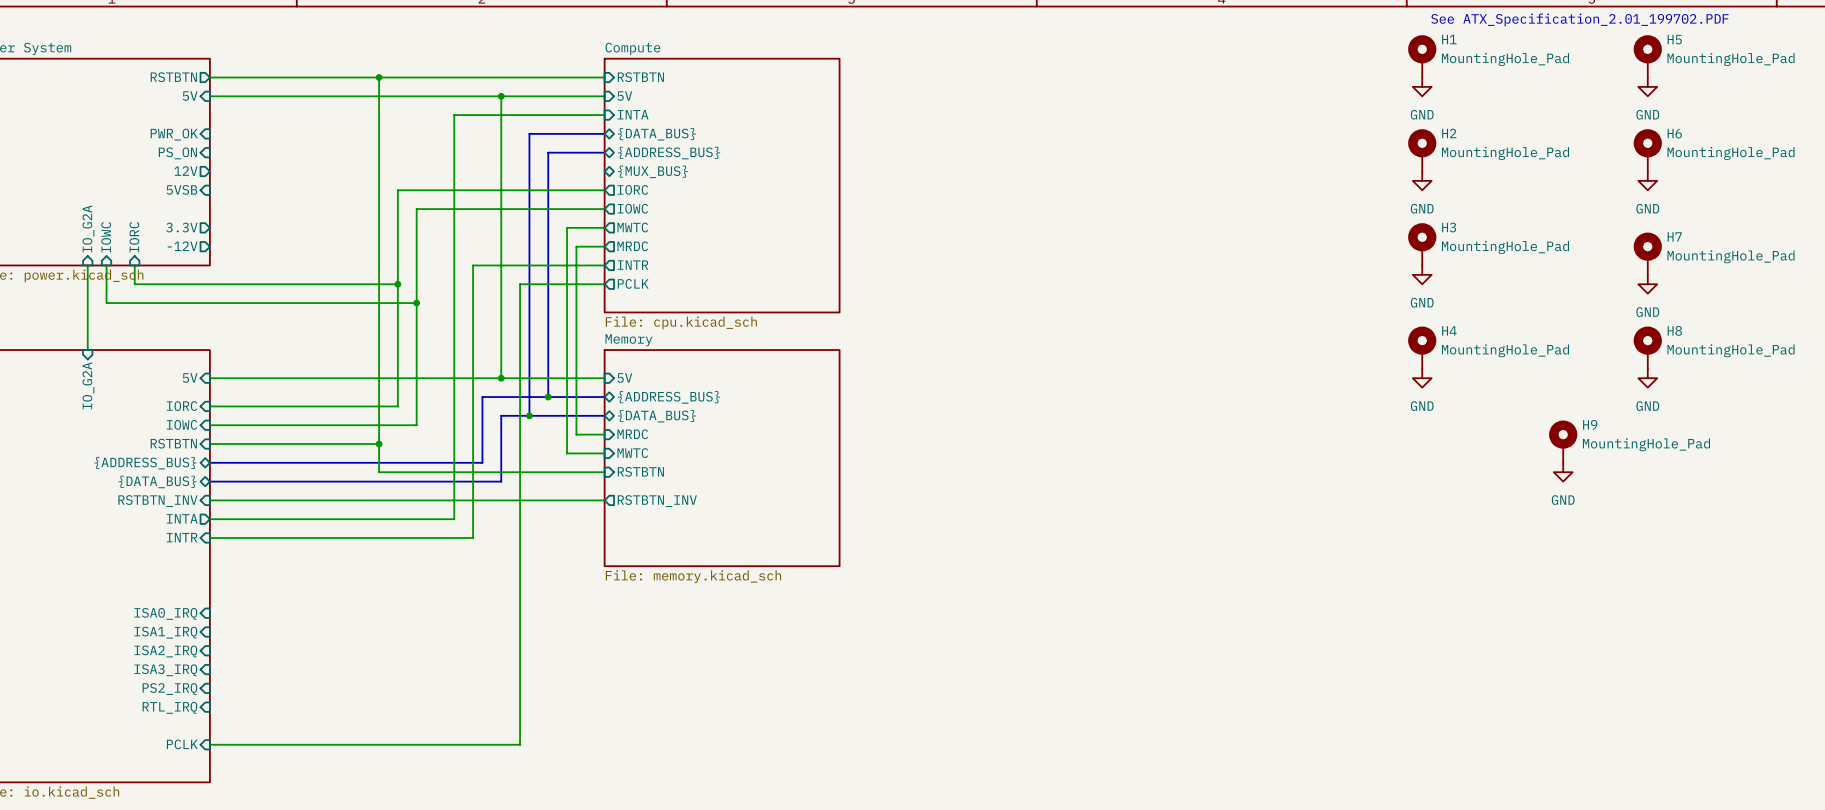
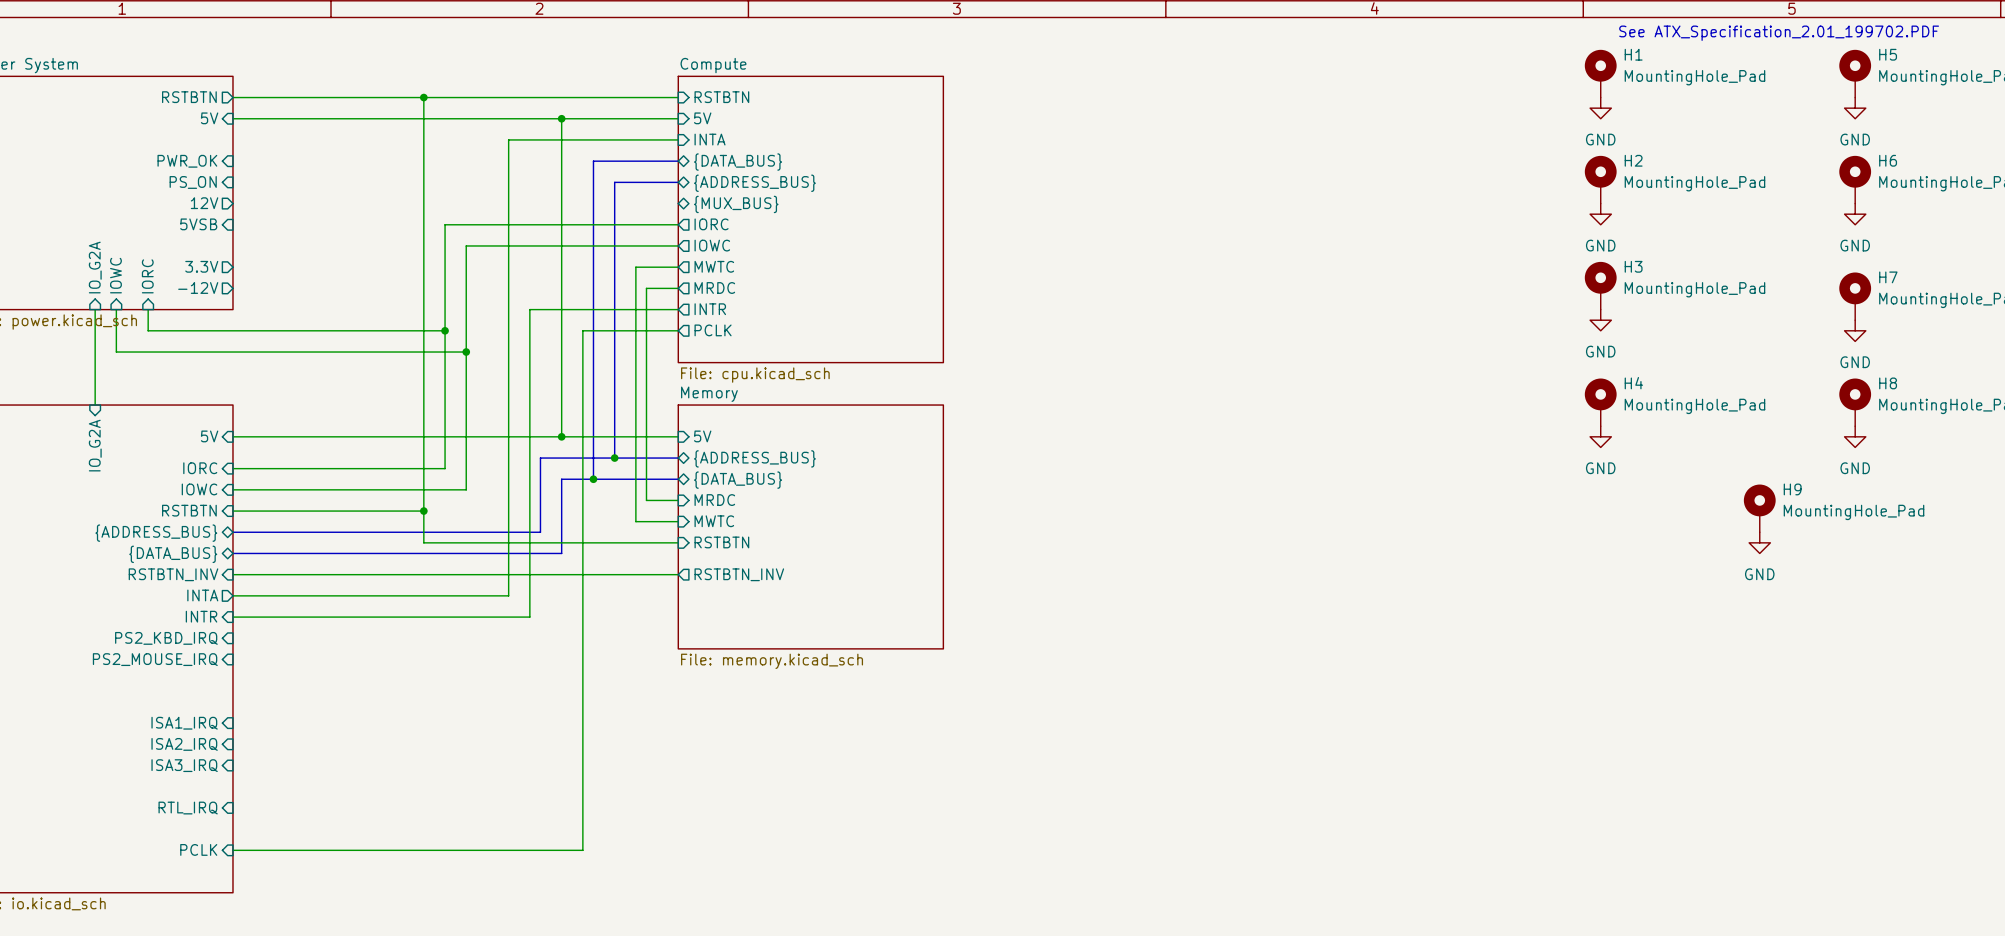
sheet pin: none -> PS2_KBD_IRQ (166, 638)
sheet pin: none -> PS2_MOUSE_IRQ (155, 659)
sheet pin: ISA0_IRQ (165, 613) -> none
sheet pin: PS2_IRQ (169, 689) -> none

